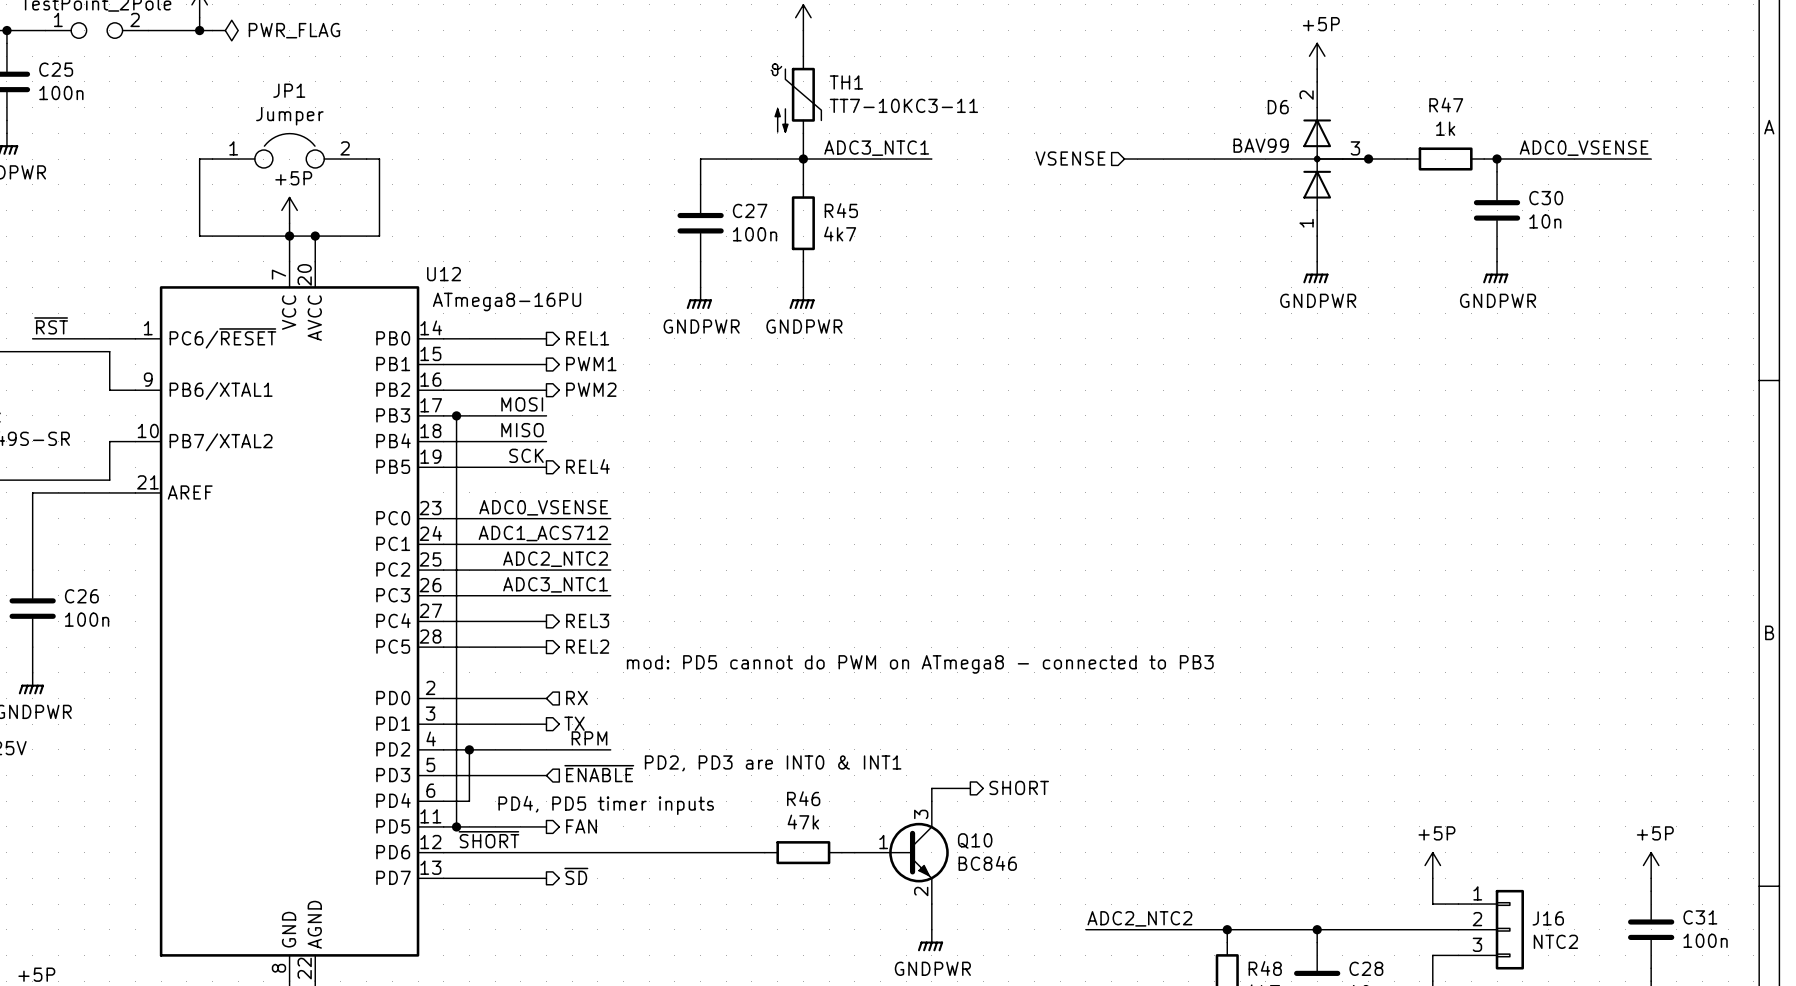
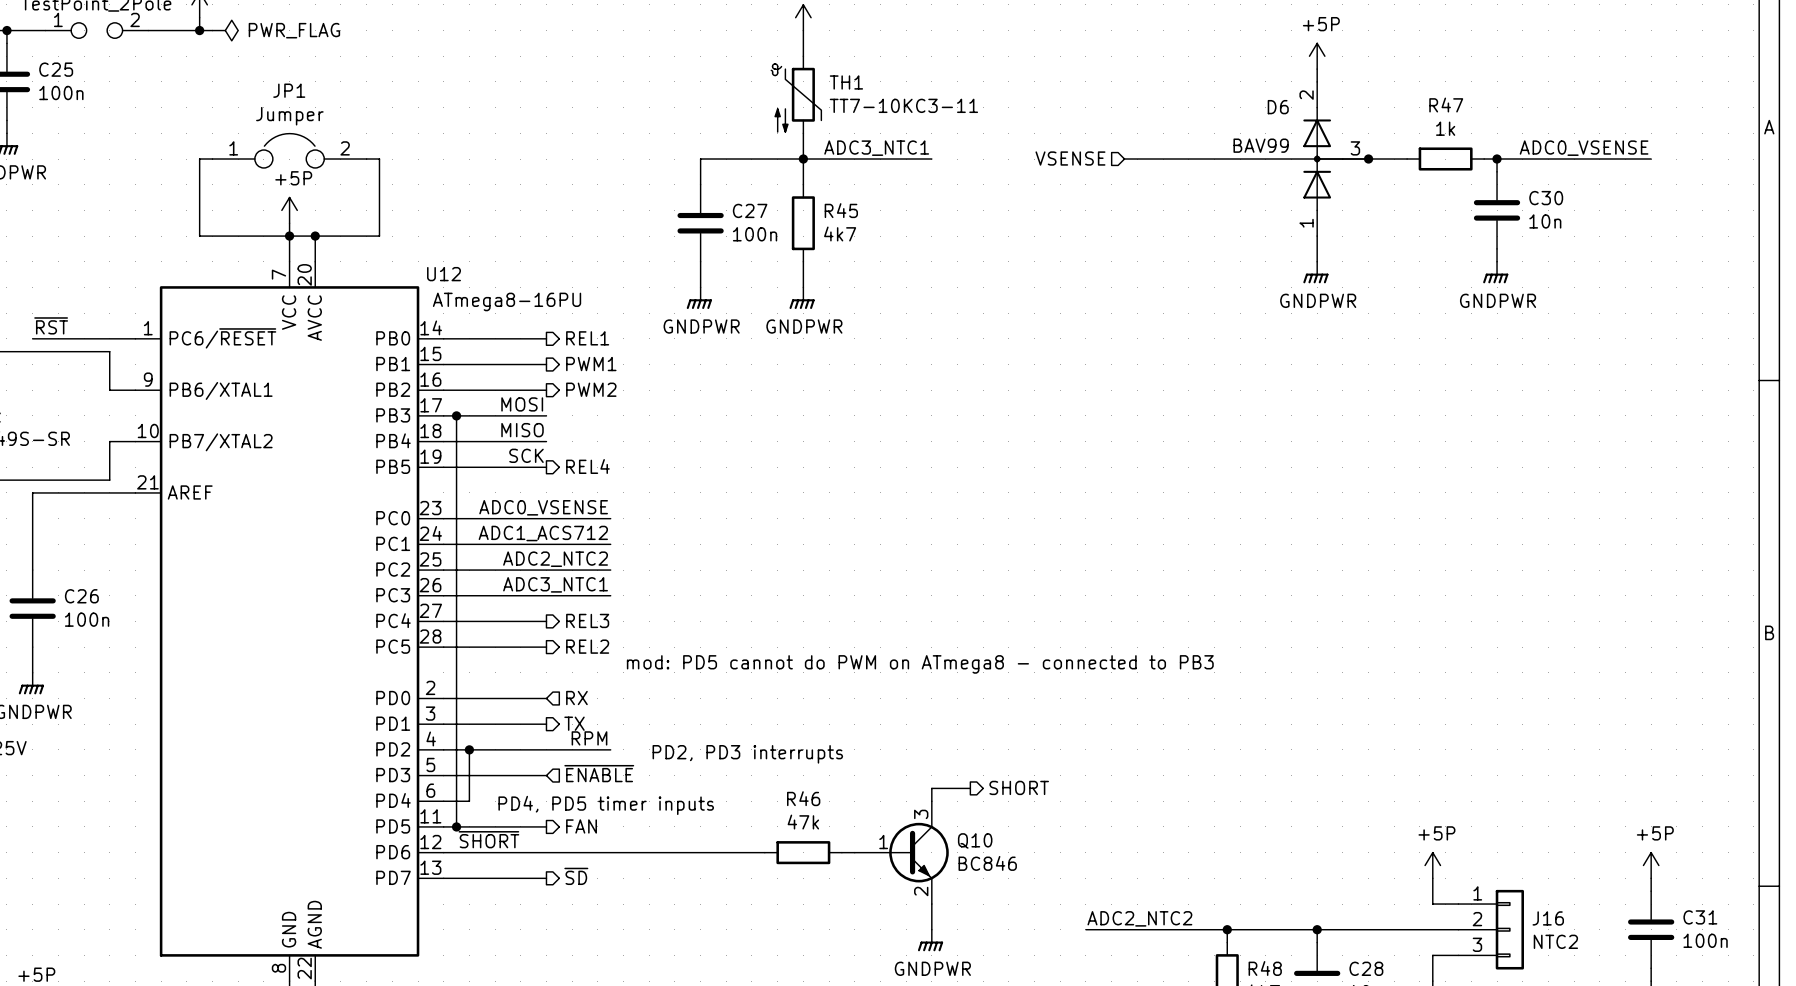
text: none -> PD2, PD3 interrupts (747, 754)
text: PD2, PD3 are INT0 & INT1 (773, 763) -> none

